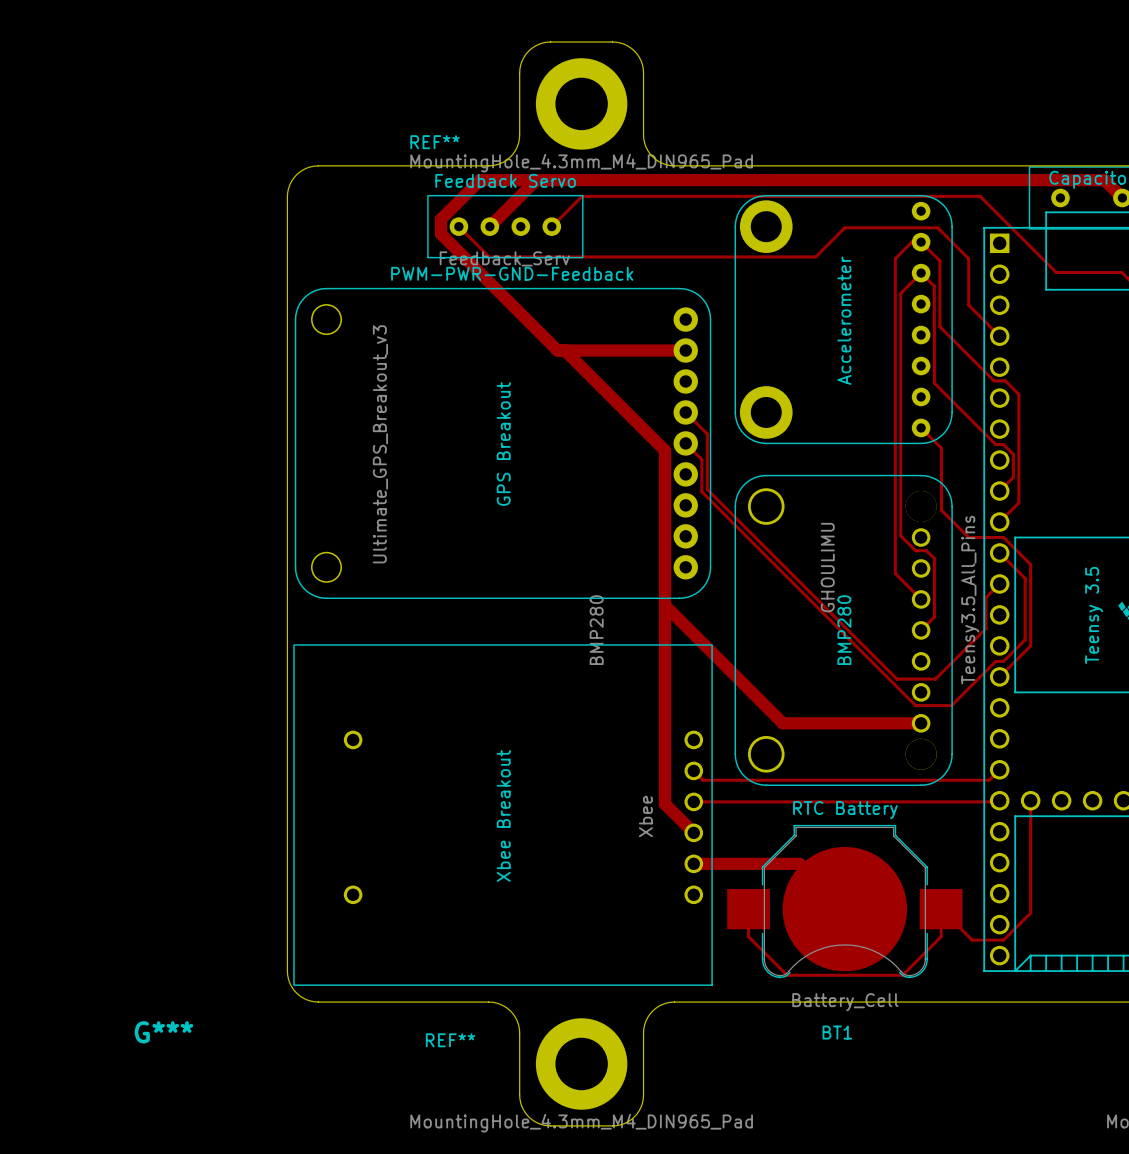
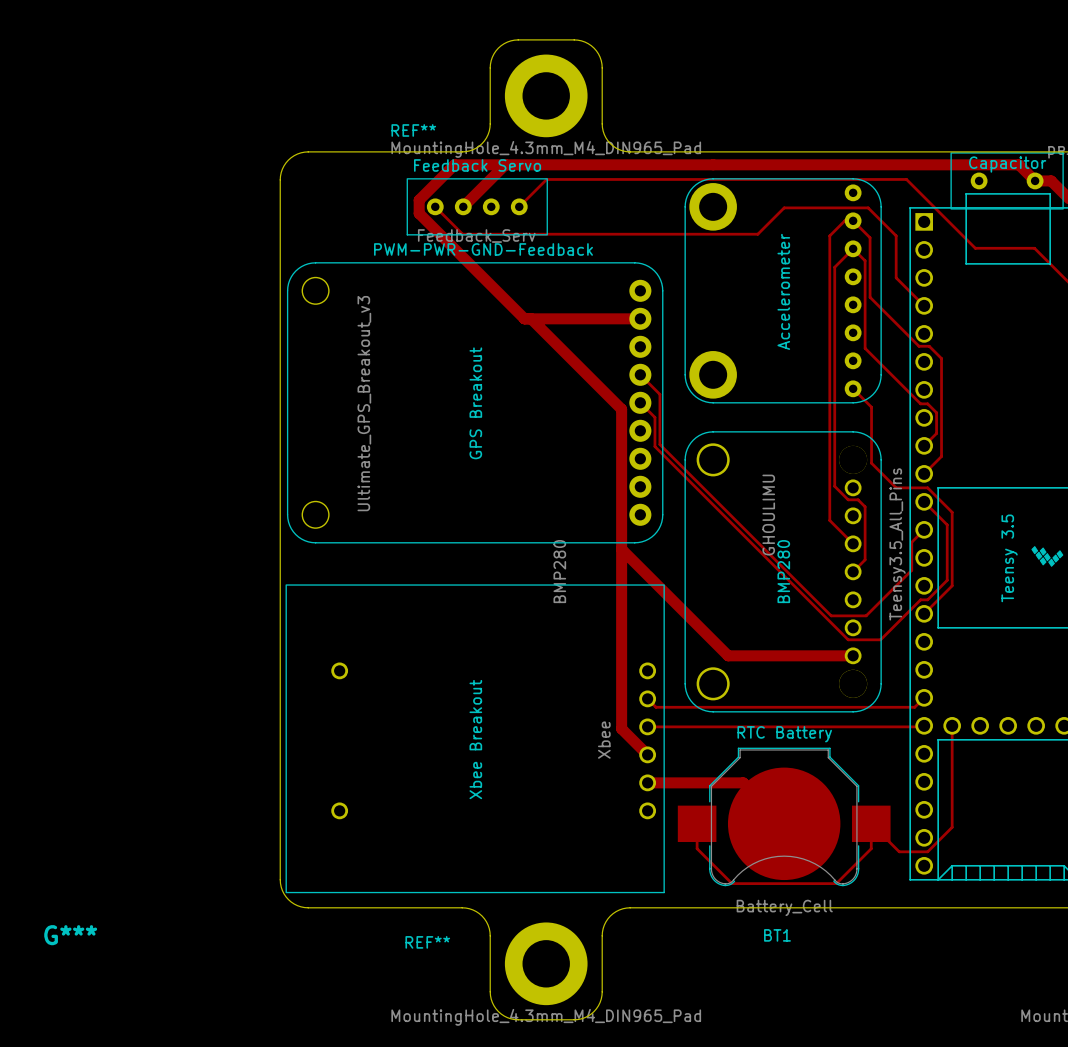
G*** position: (163, 1032) -> (70, 935)

